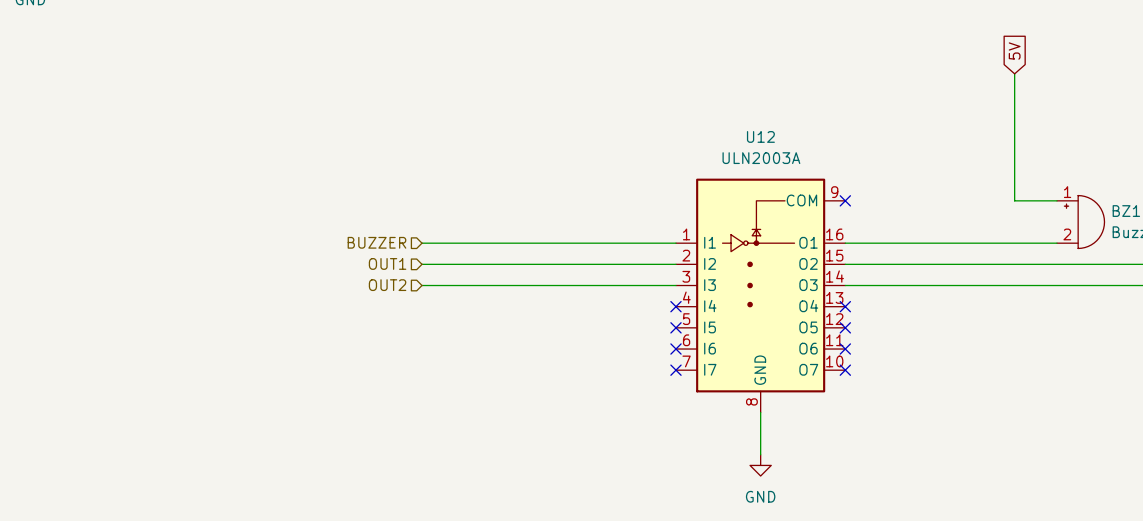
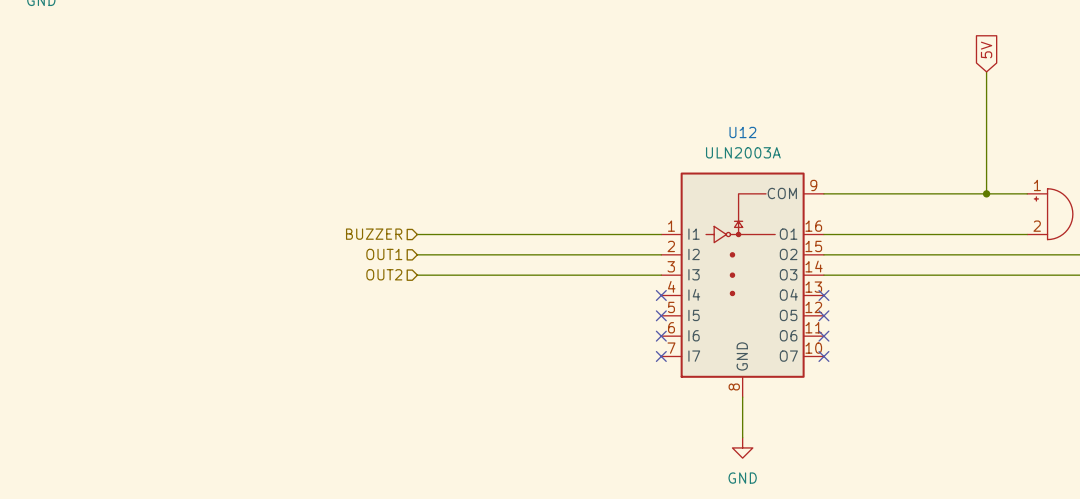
wire: none -> (823, 193) (986, 193)
no-connect mark: (845, 200) -> none
junction: none -> (986, 193)

